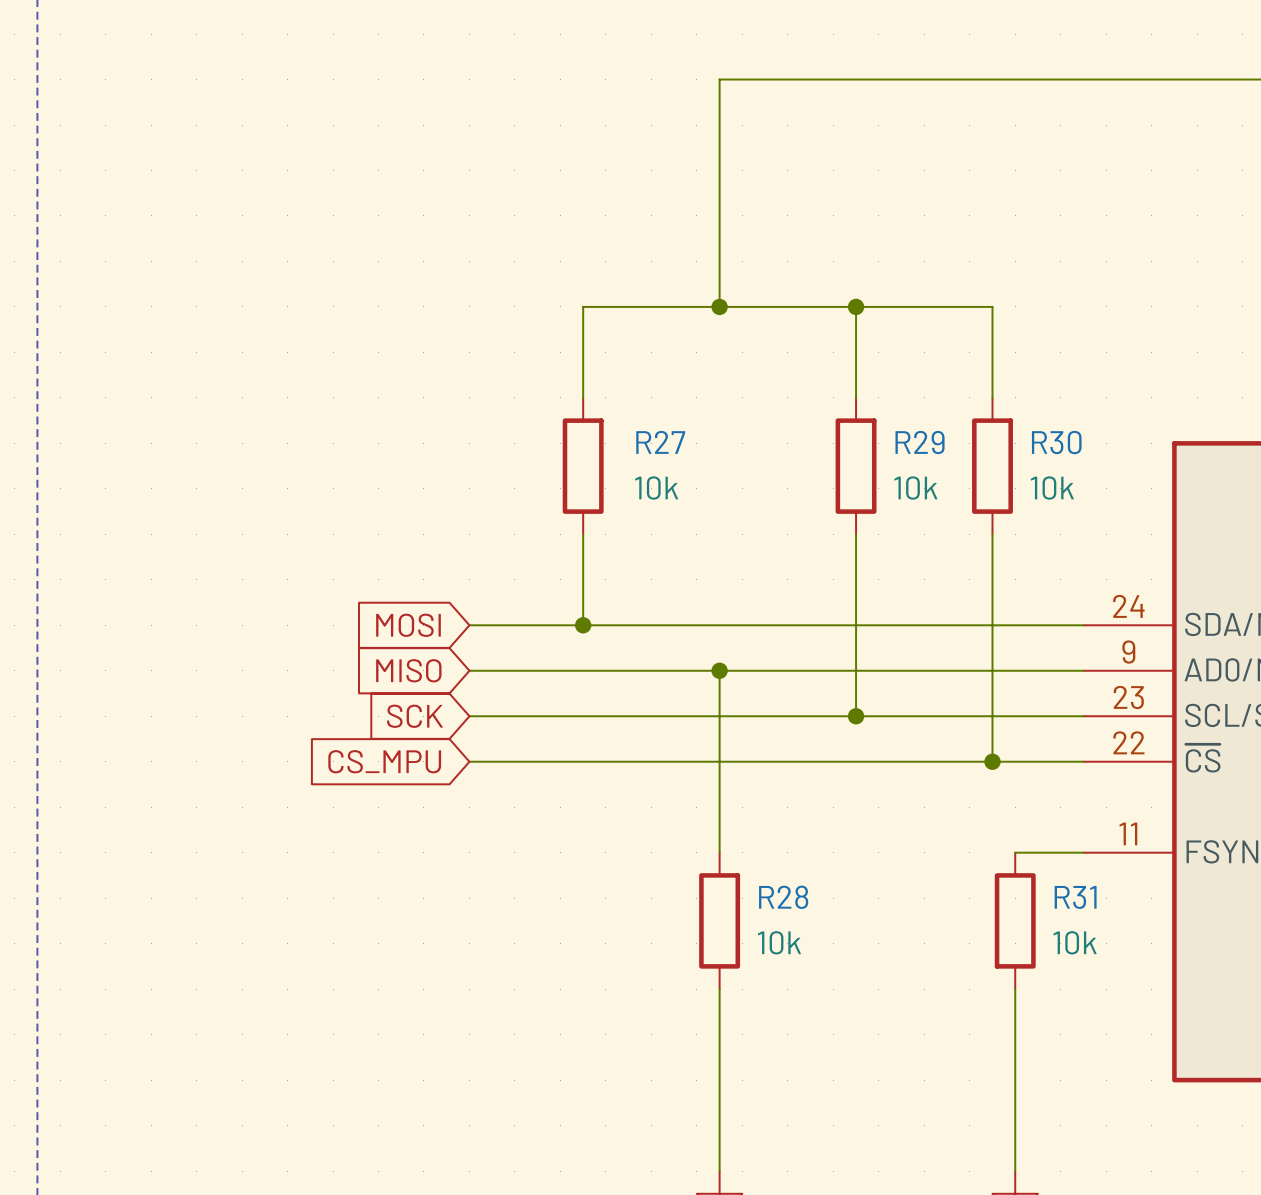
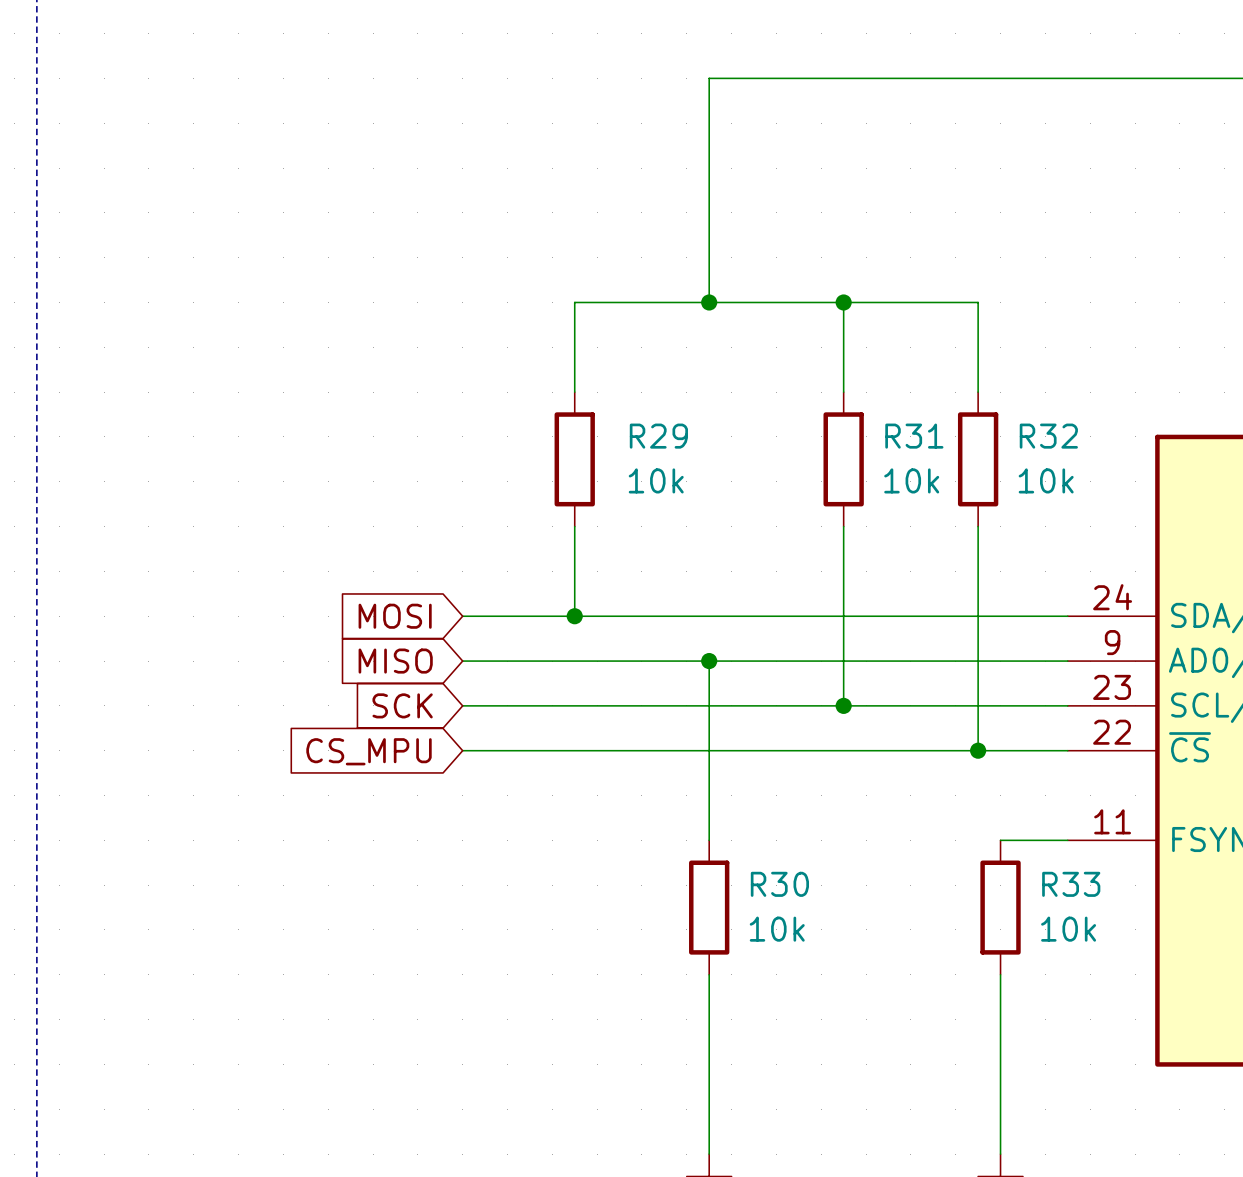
R27 name: R27 (660, 442) -> R29 (658, 436)
R29 name: R29 (920, 442) -> R31 (914, 436)
R30 name: R30 (1056, 442) -> R32 (1048, 436)
R28 name: R28 (783, 897) -> R30 (779, 884)
R31 name: R31 (1075, 897) -> R33 (1071, 884)

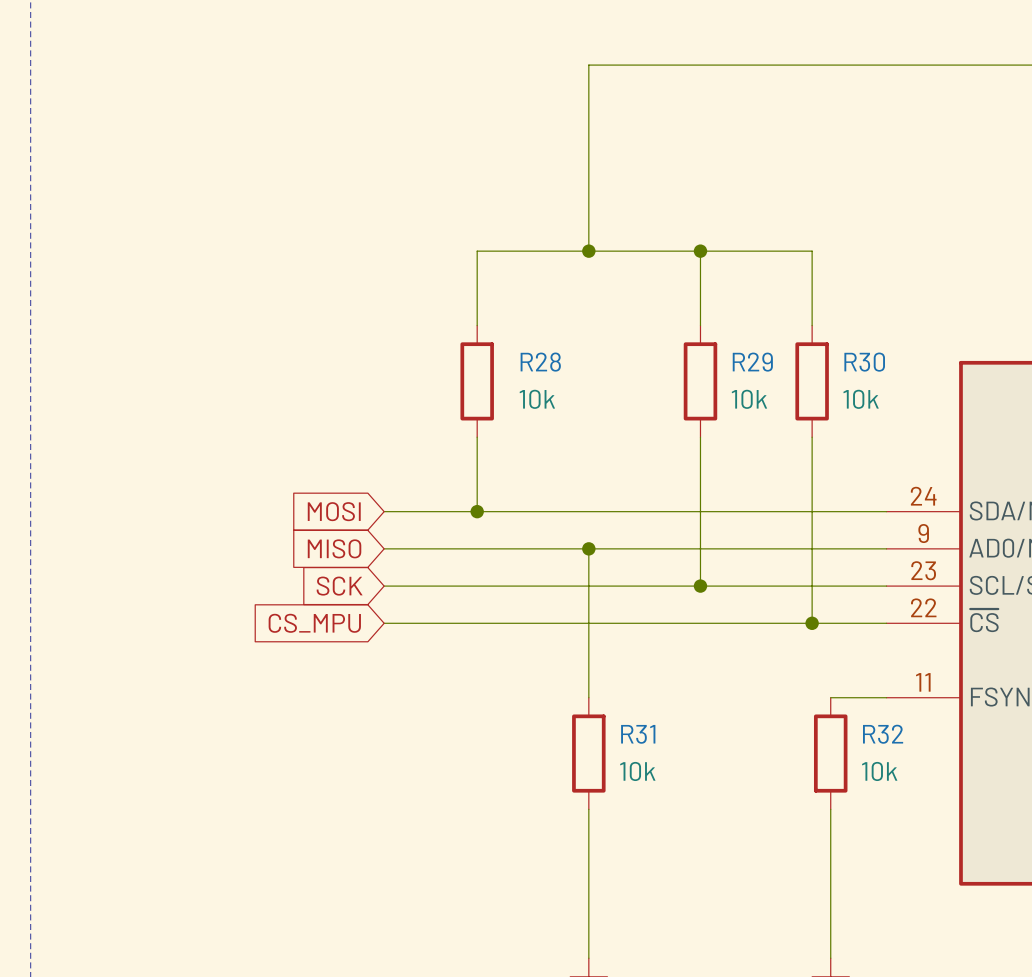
R29 name: R29 (658, 436) -> R28 (540, 362)
R31 name: R31 (914, 436) -> R29 (752, 362)
R32 name: R32 (1048, 436) -> R30 (864, 362)
R30 name: R30 (779, 884) -> R31 (638, 734)
R33 name: R33 (1071, 884) -> R32 (883, 734)

